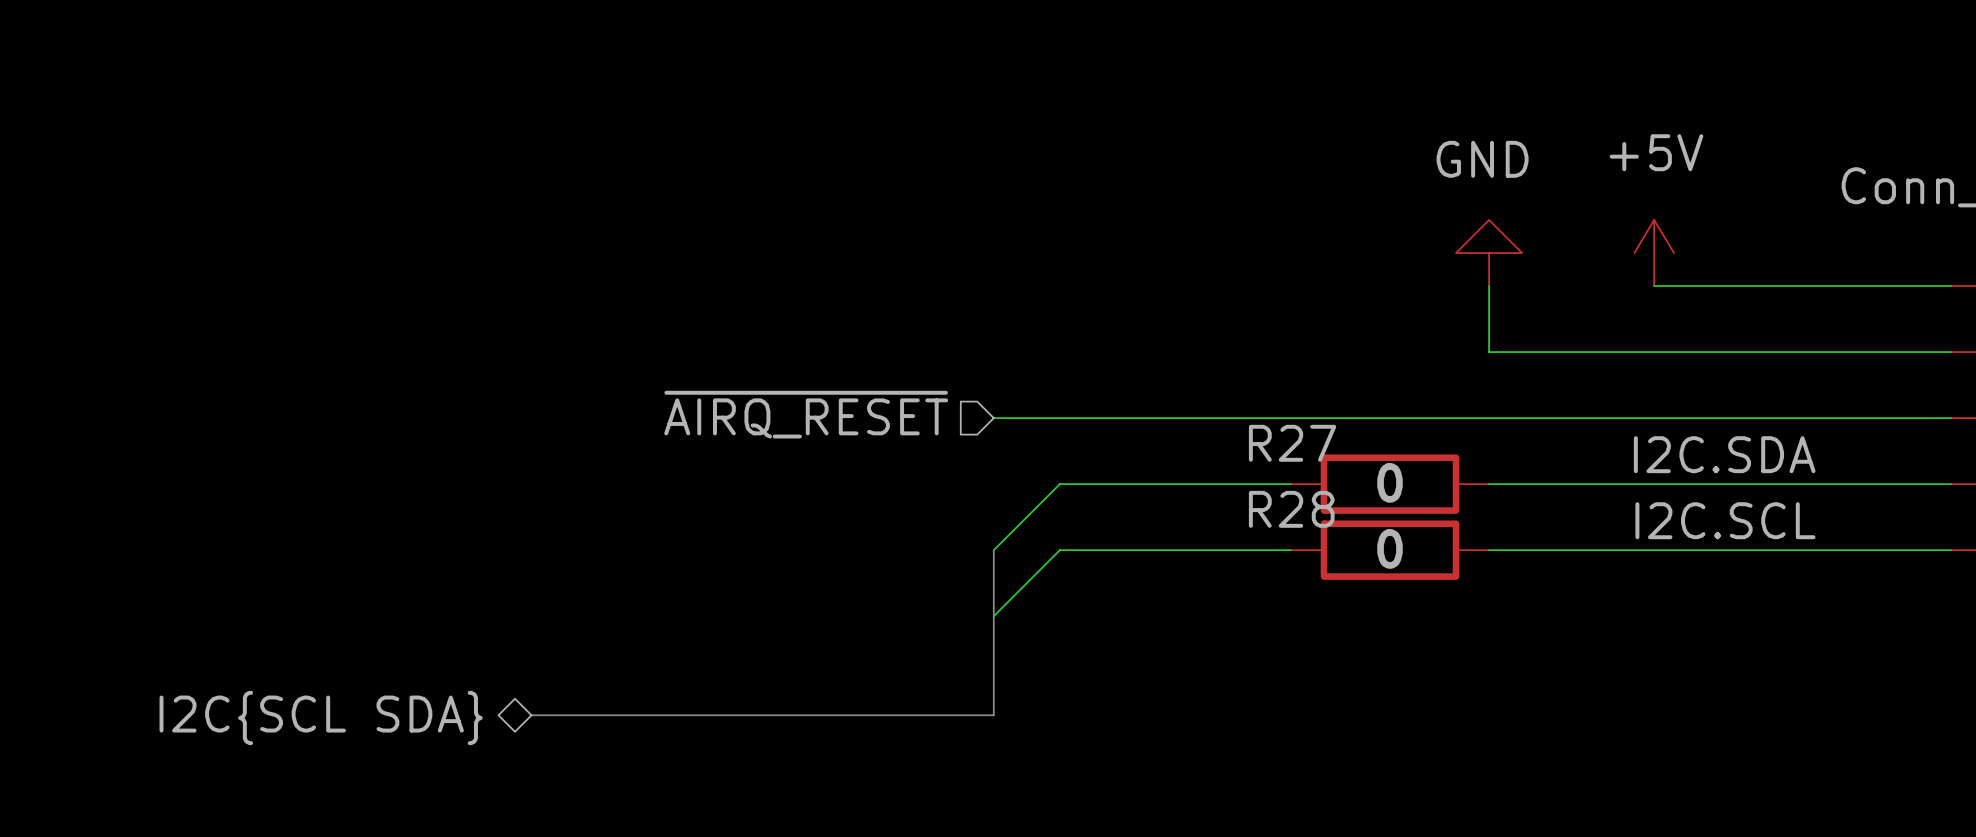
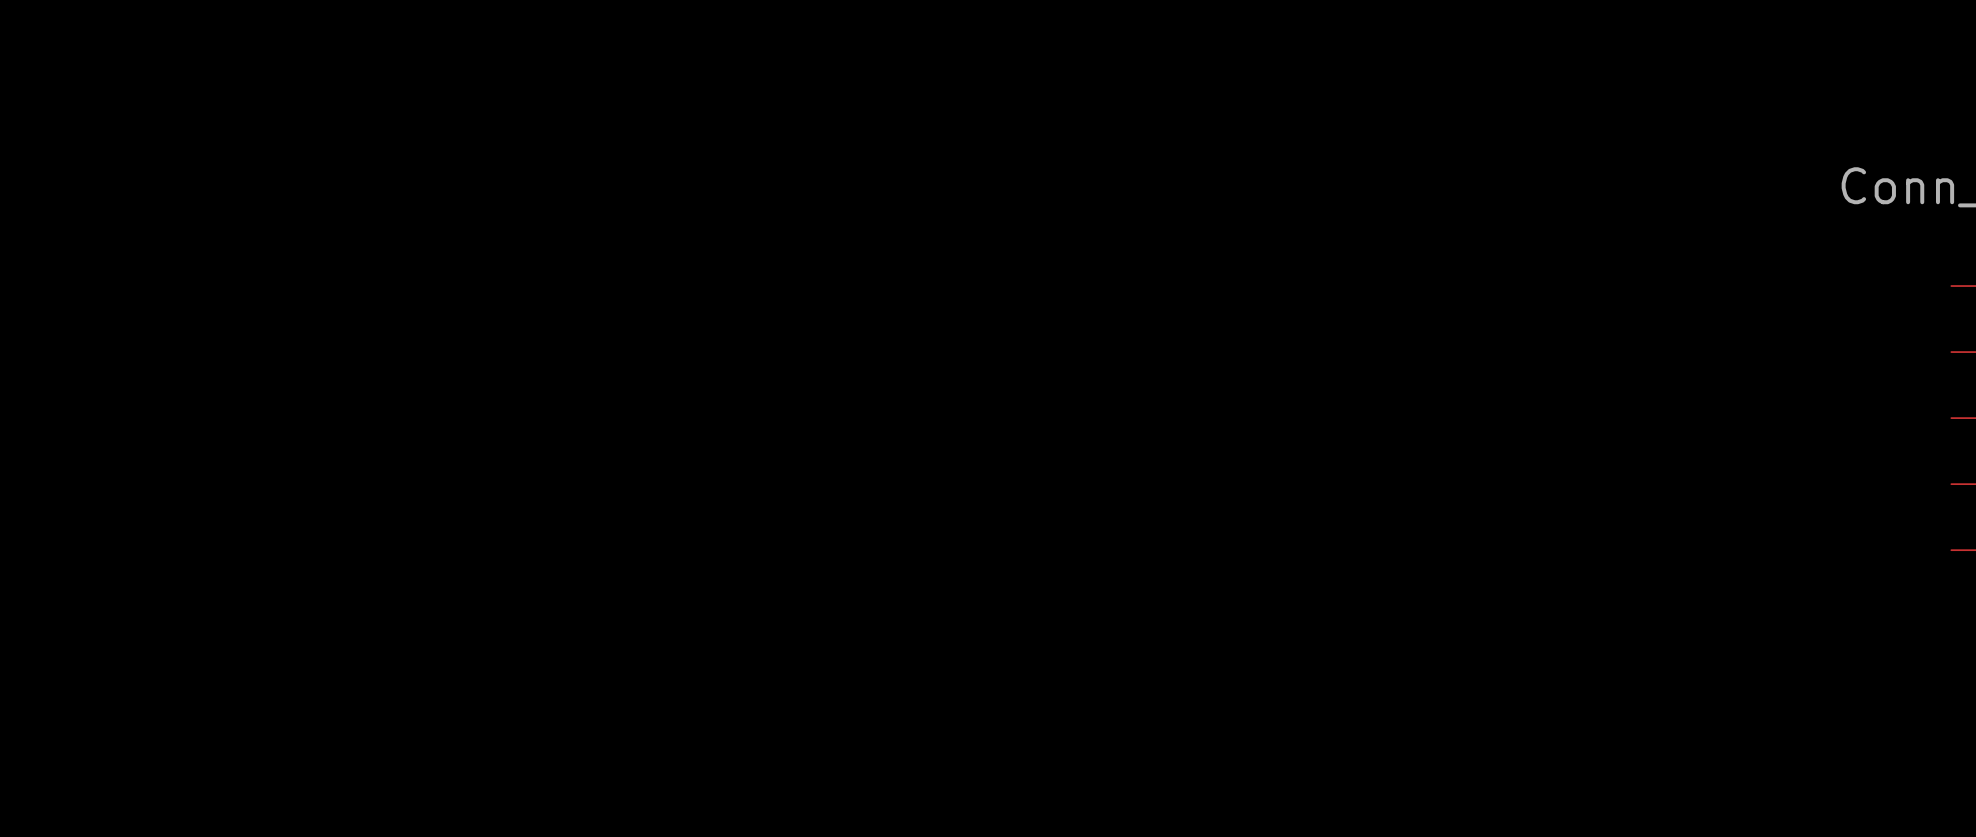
power symbol: GND (1489, 253) -> none
power symbol: +5V (1654, 253) -> none
wire: (1489, 286) (1489, 352) (1951, 352) -> none
wire: (1654, 286) (1951, 286) -> none
hierarchical label: ~{AIRQ_RESET} (806, 414) -> none
wire: (993, 418) (1951, 418) -> none
label: I2C.SDA (1724, 454) -> none
wire: (1290, 484) (1059, 484) (993, 550) -> none
R27: 0 (1390, 484) -> none
wire: (1489, 484) (1951, 484) -> none
label: I2C.SCL (1725, 520) -> none
bus: (993, 550) (993, 715) (531, 715) -> none
wire: (1290, 550) (1059, 550) (993, 616) -> none
R28: 0 (1390, 550) -> none
wire: (1489, 550) (1951, 550) -> none
hierarchical label: I2C{SCL SDA} (321, 717) -> none

